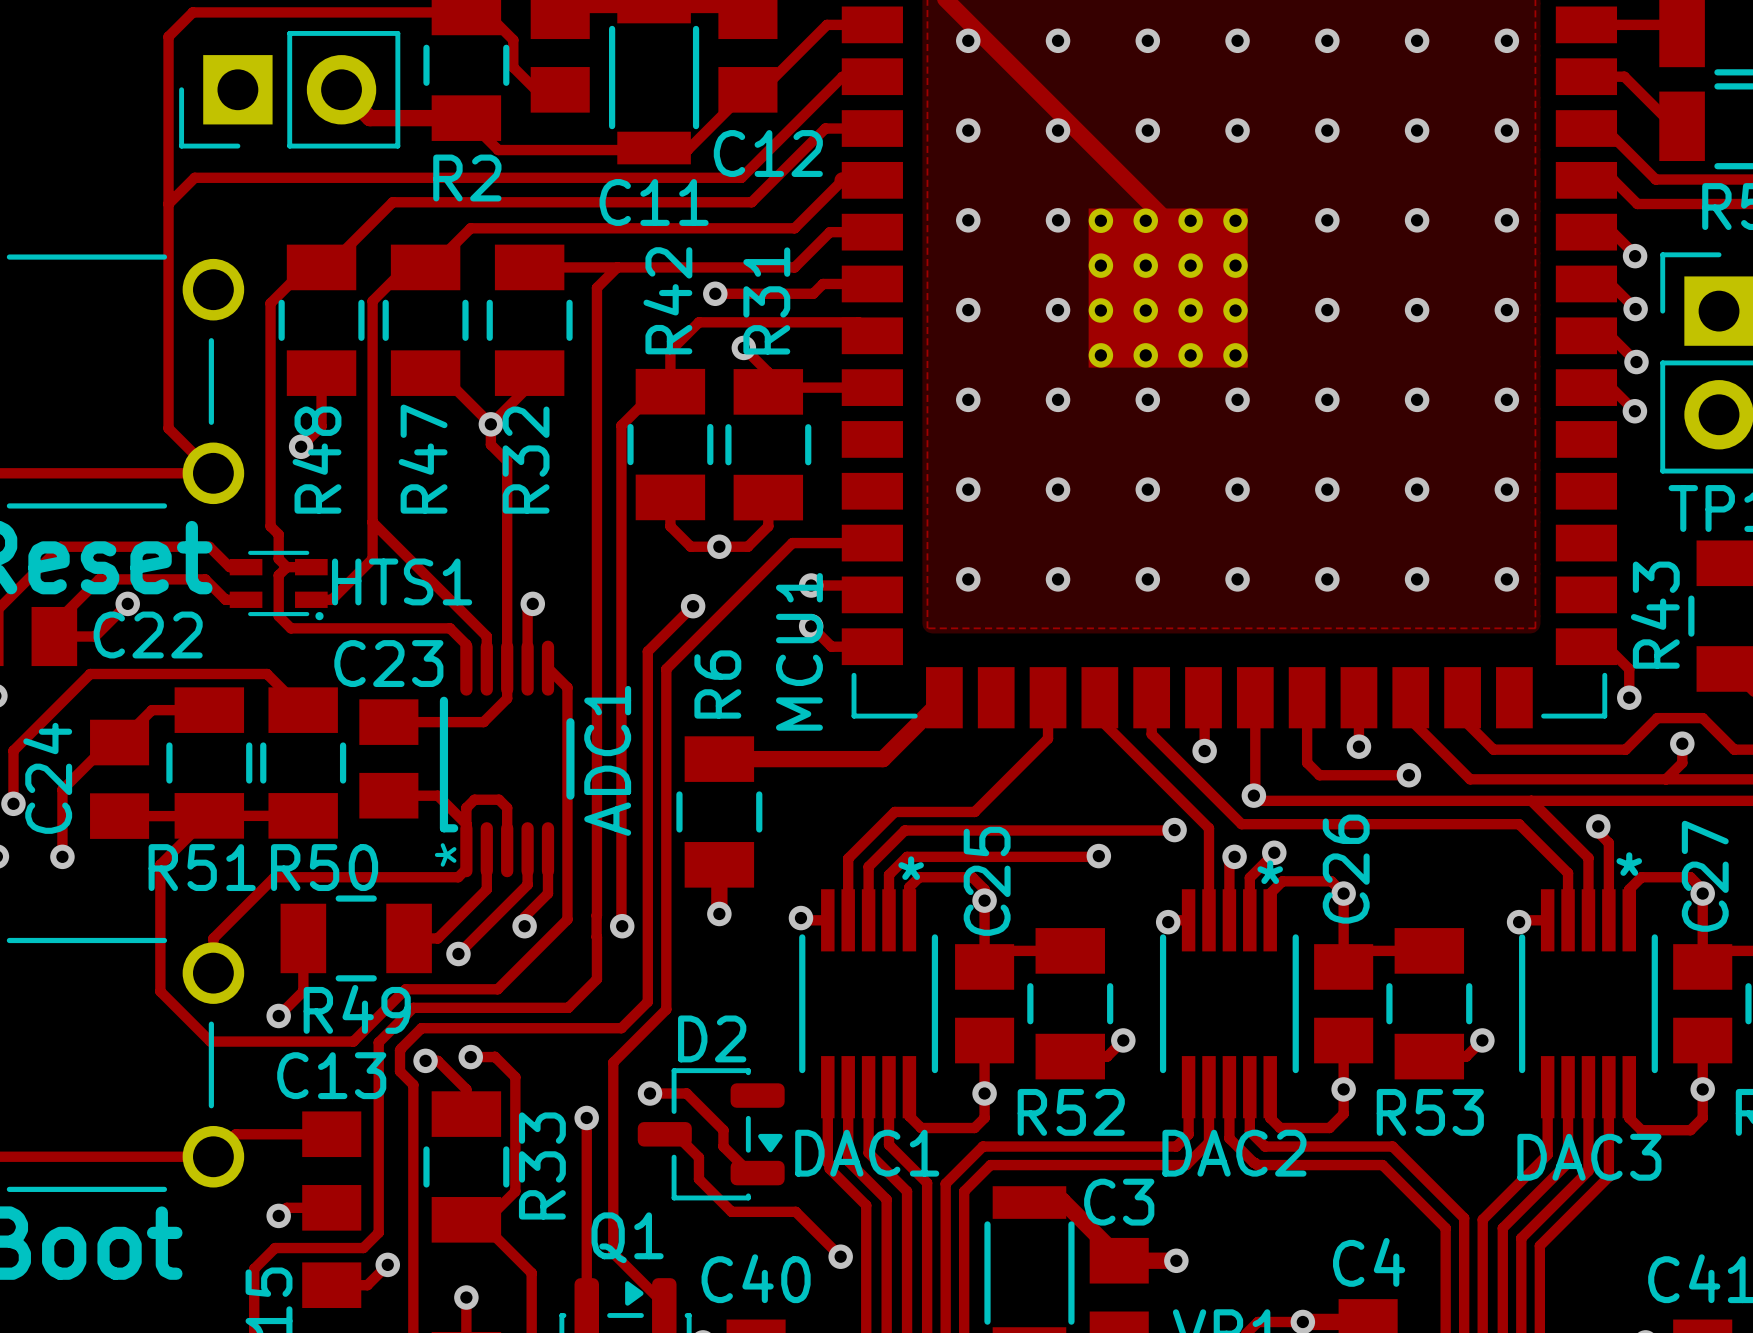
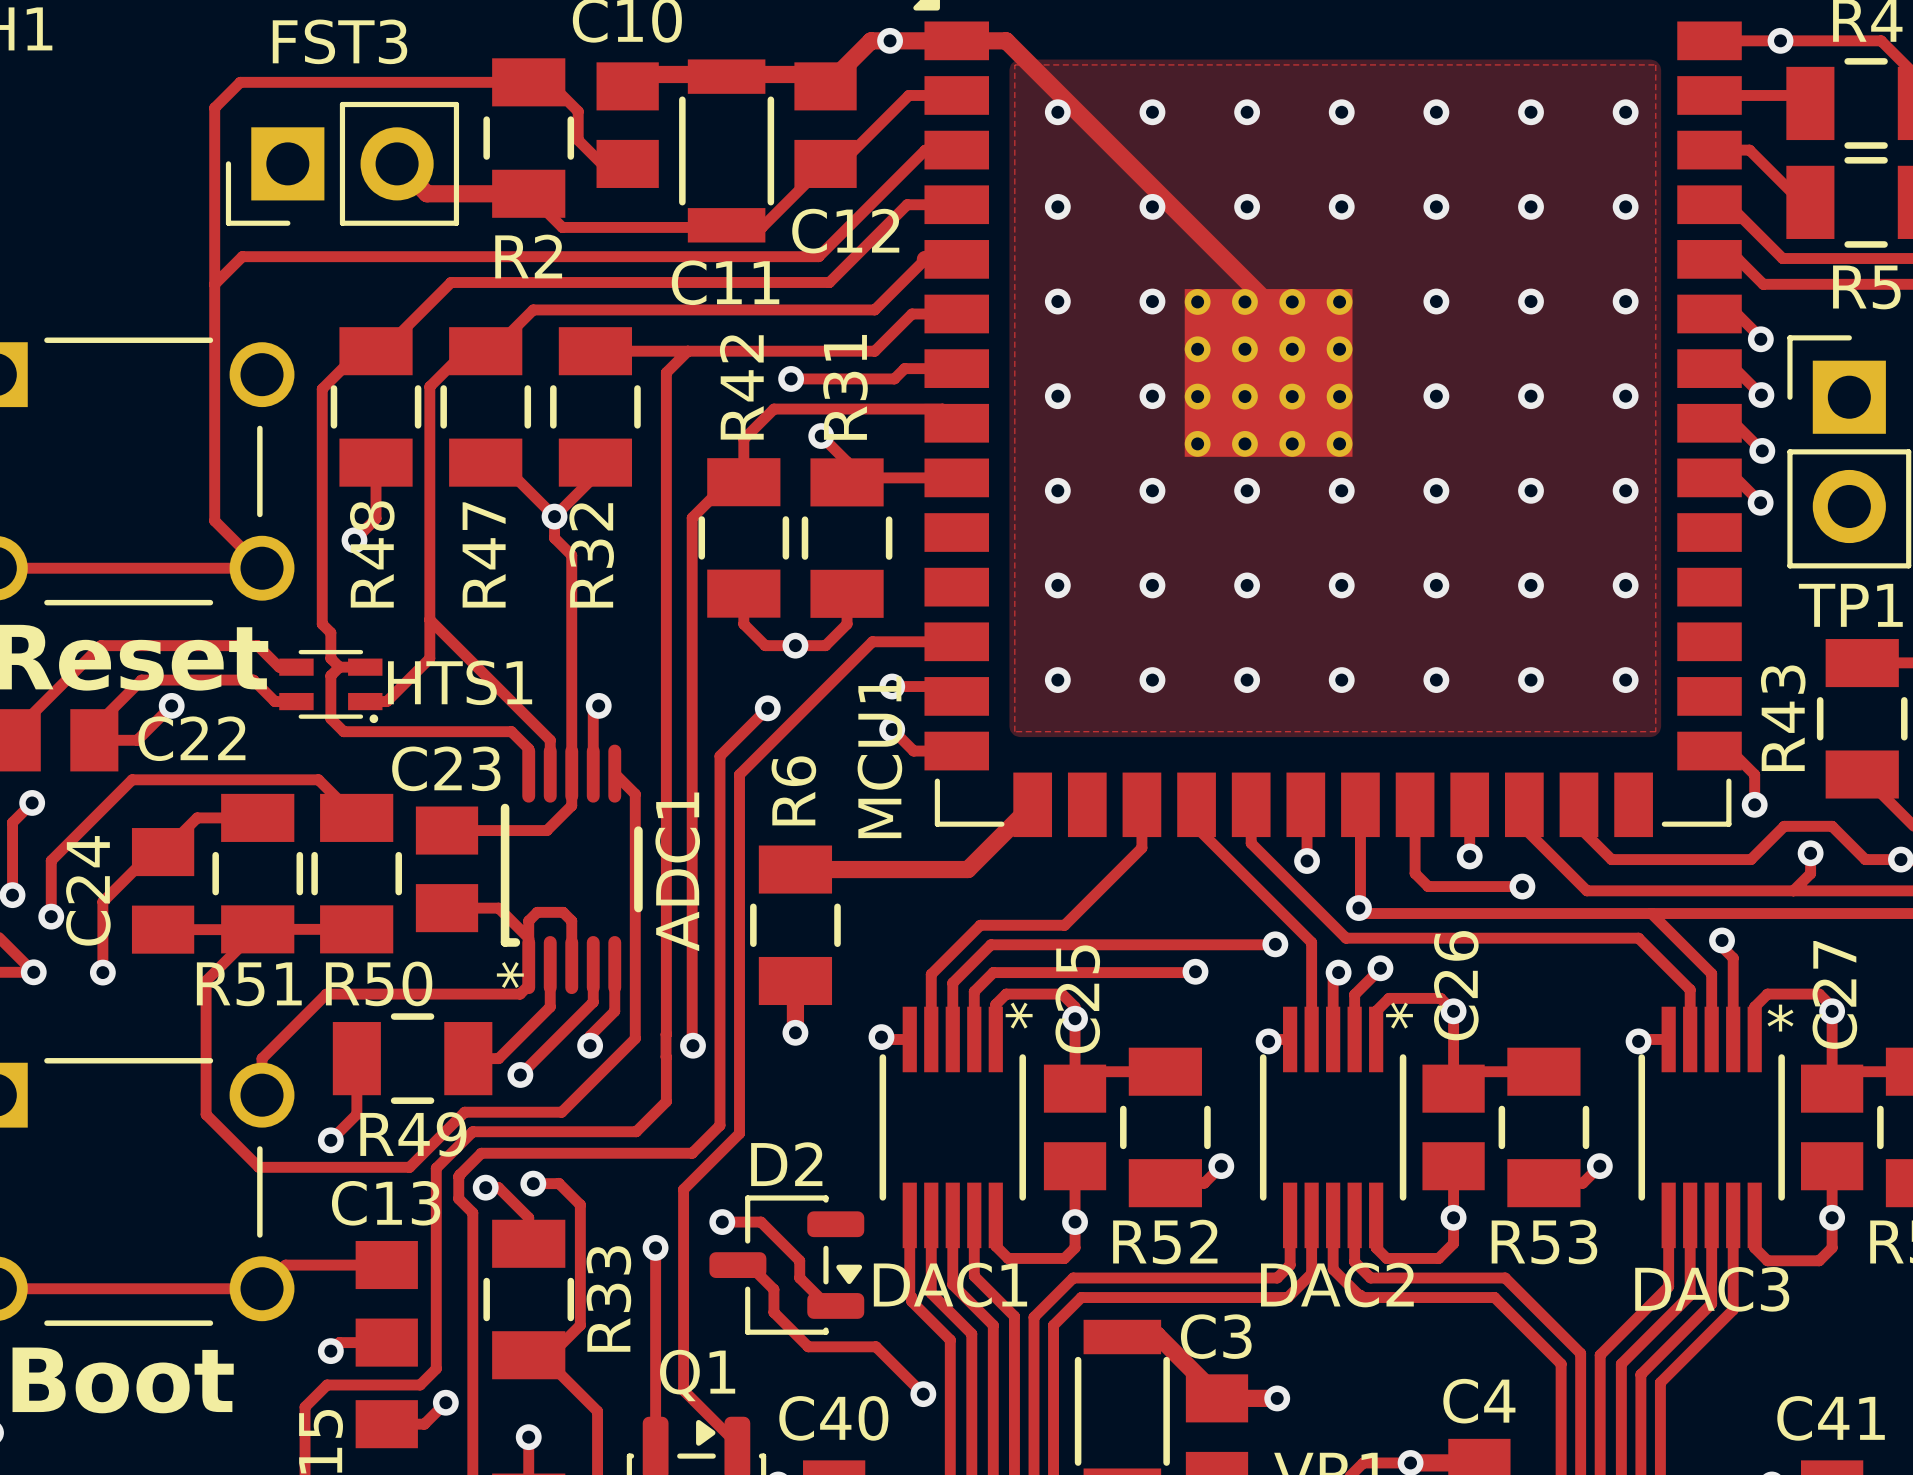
DAC3 text position: * (1629, 864) -> * (1780, 1018)
DAC1 text rotation: 0° (911, 868) -> 90° clockwise (1019, 1015)
DAC2 text rotation: 0° (1270, 872) -> 90° clockwise (1399, 1015)

